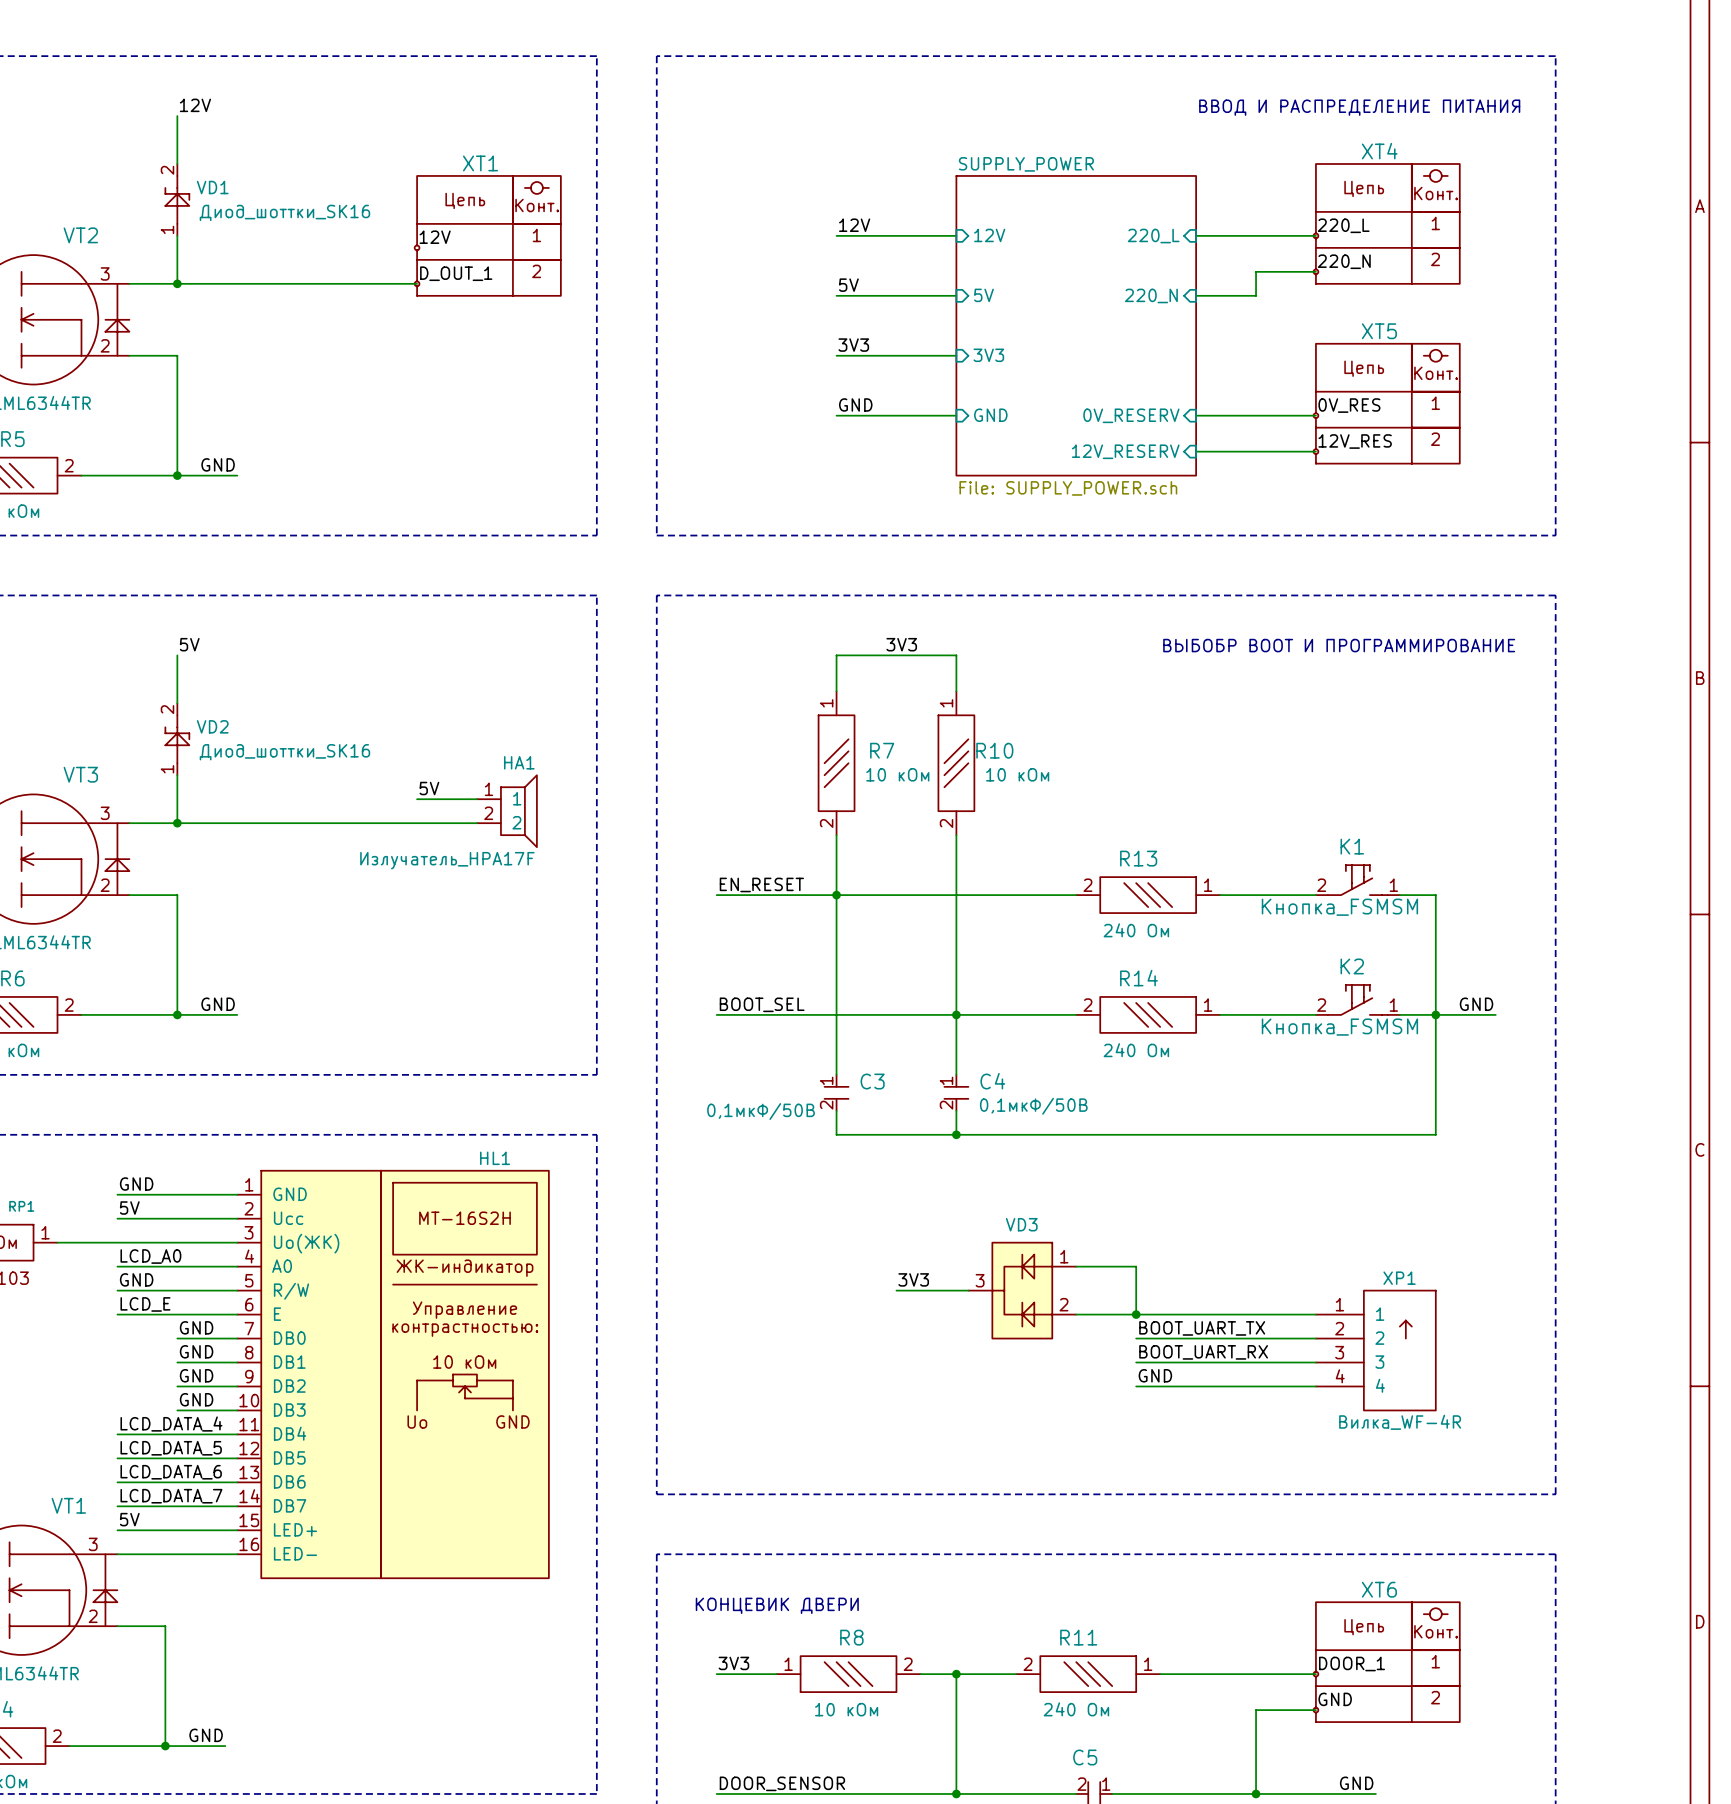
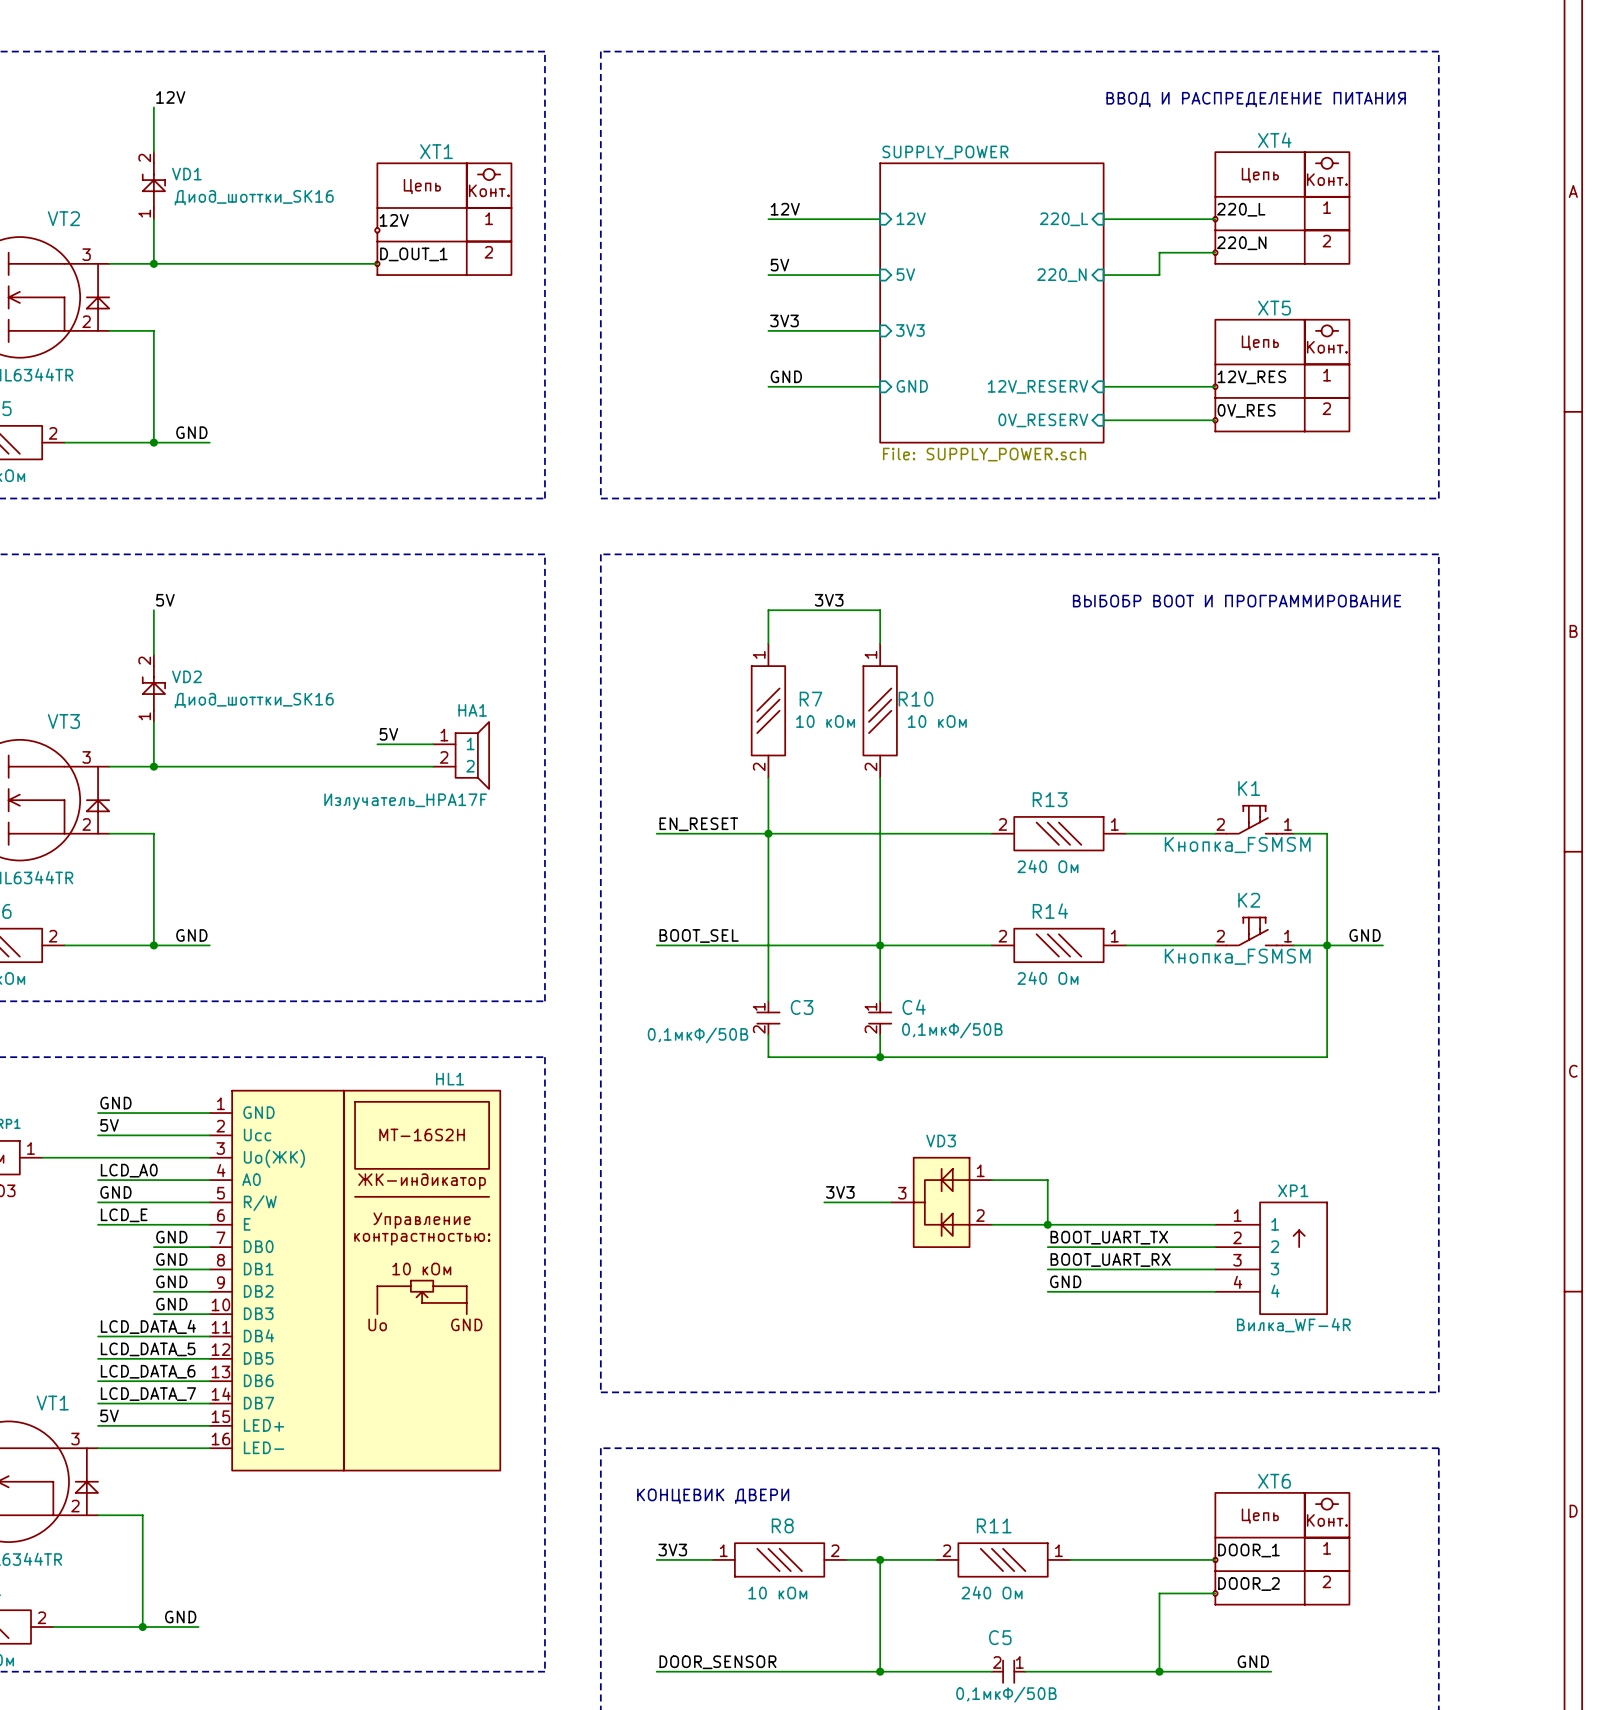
label: 0V_RES (1349, 405) -> 12V_RES (1251, 377)
sheet pin: 0V_RESERV (1131, 415) -> 12V_RESERV (1038, 386)
label: 12V_RES (1355, 441) -> 0V_RES (1246, 410)
sheet pin: 12V_RESERV (1125, 451) -> 0V_RESERV (1043, 420)
label: GND (1335, 1699) -> DOOR_2 (1248, 1584)

